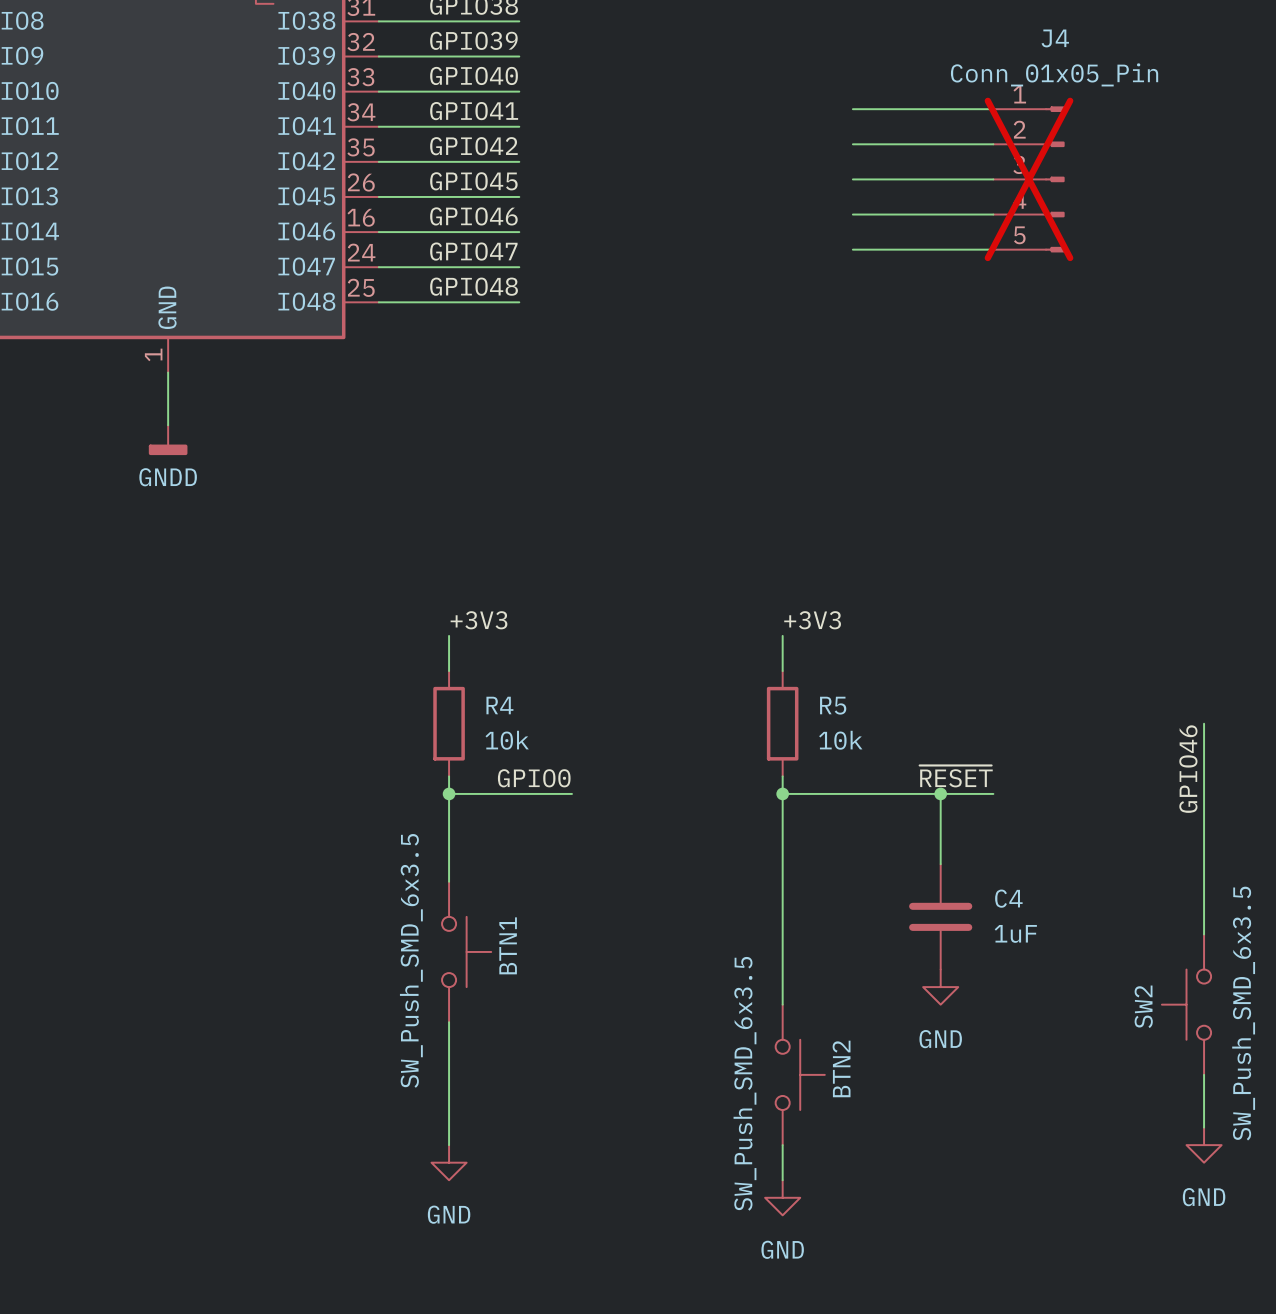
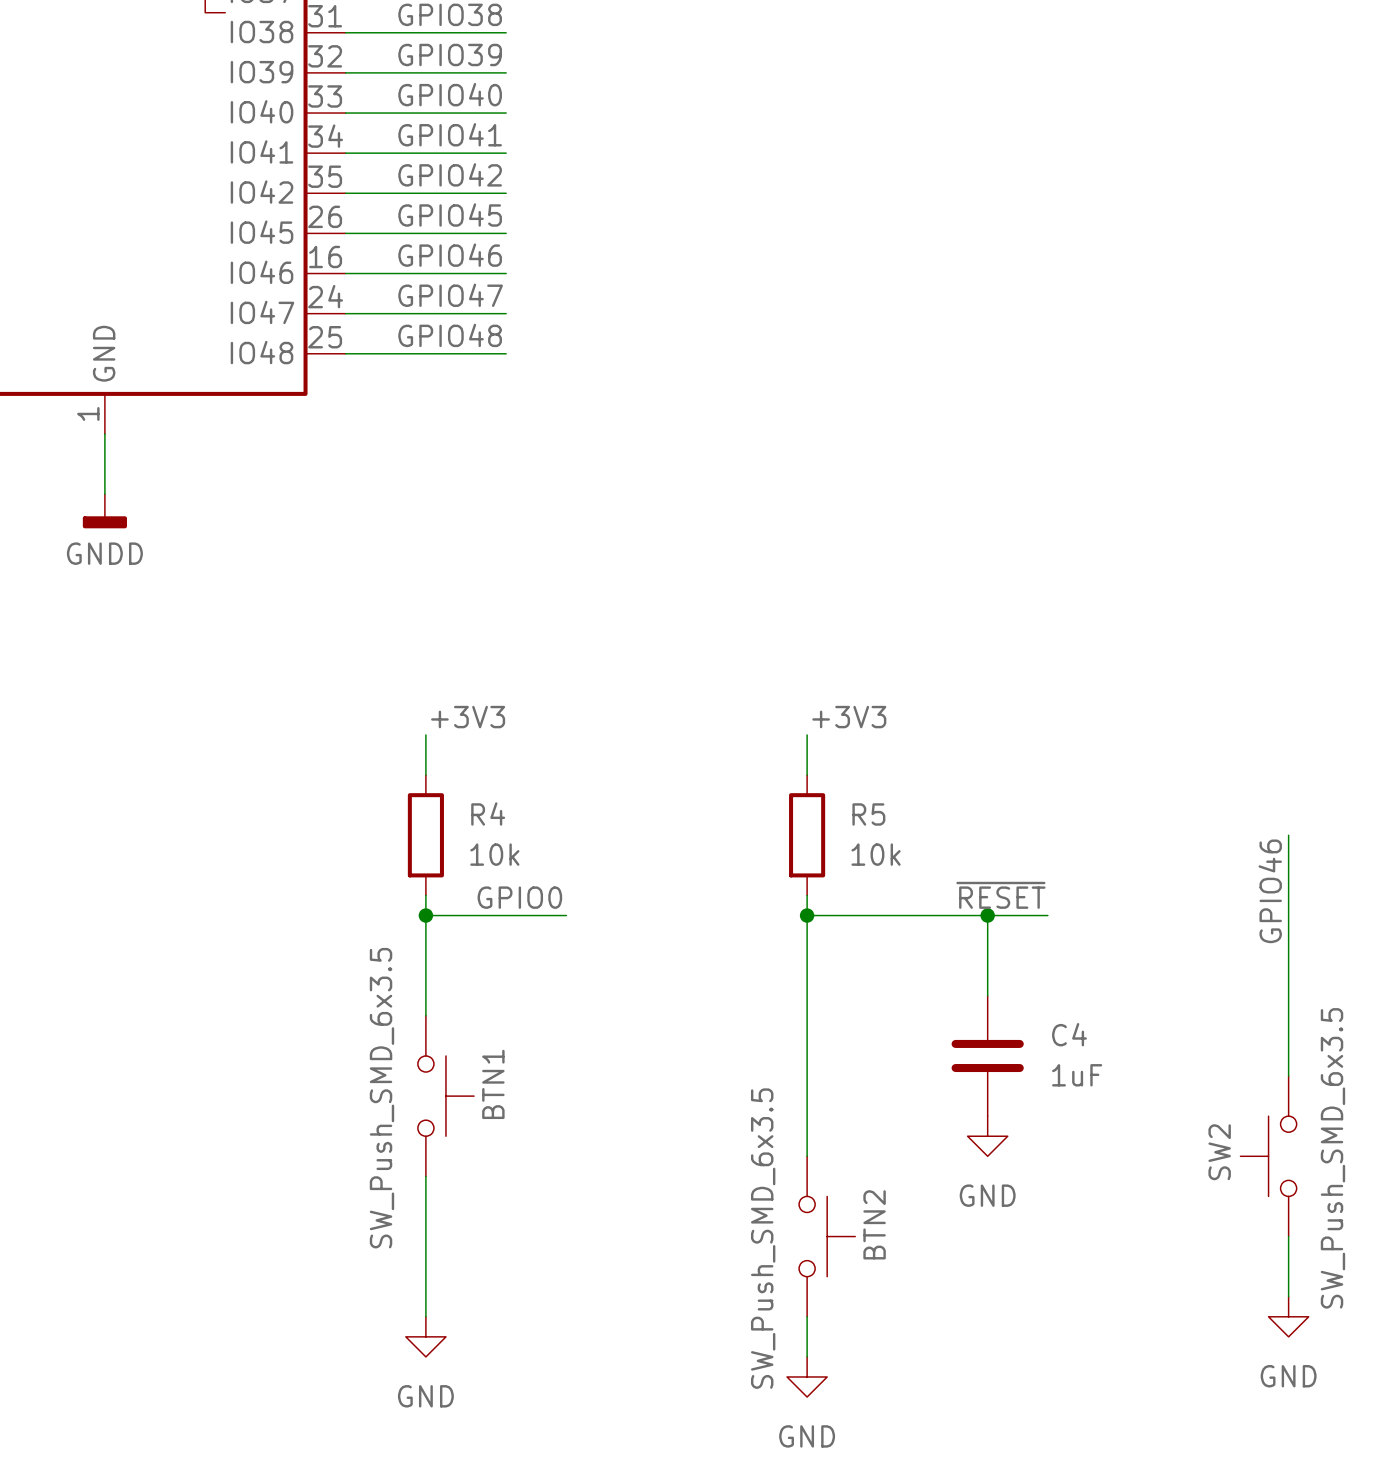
wire: (852, 109) (993, 109) -> none
wire: (852, 144) (993, 144) -> none
wire: (852, 179) (993, 179) -> none
J4: Conn_01x05_Pin (1029, 179) -> none
wire: (852, 214) (993, 214) -> none
wire: (852, 249) (993, 249) -> none

